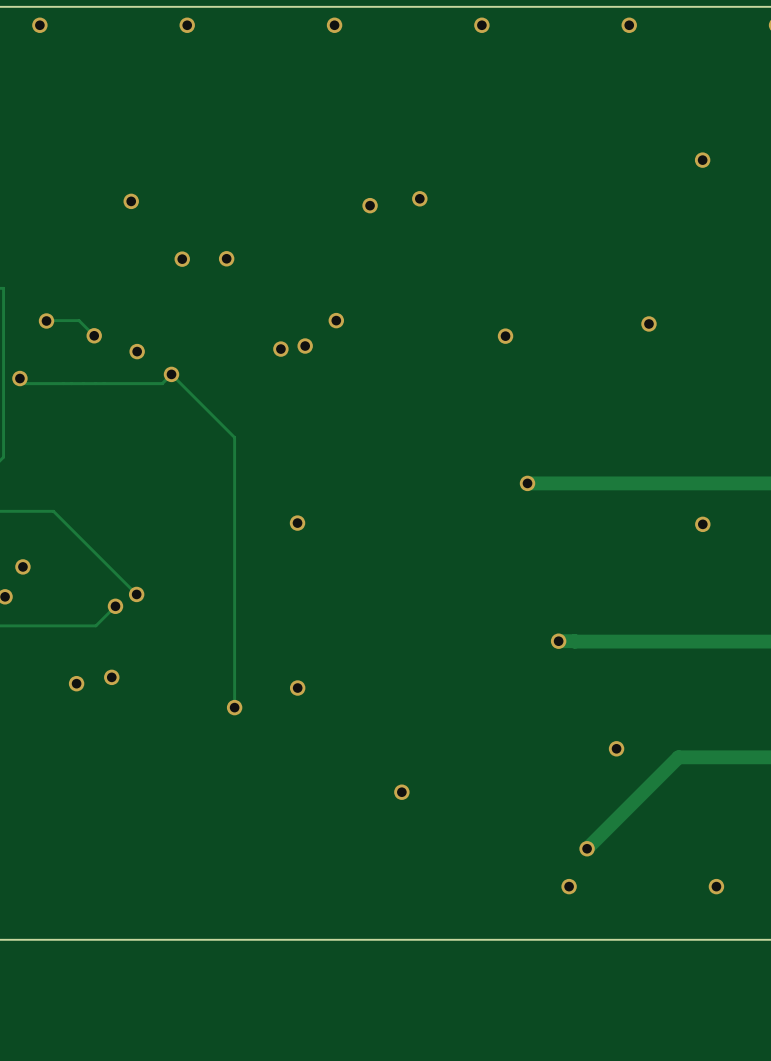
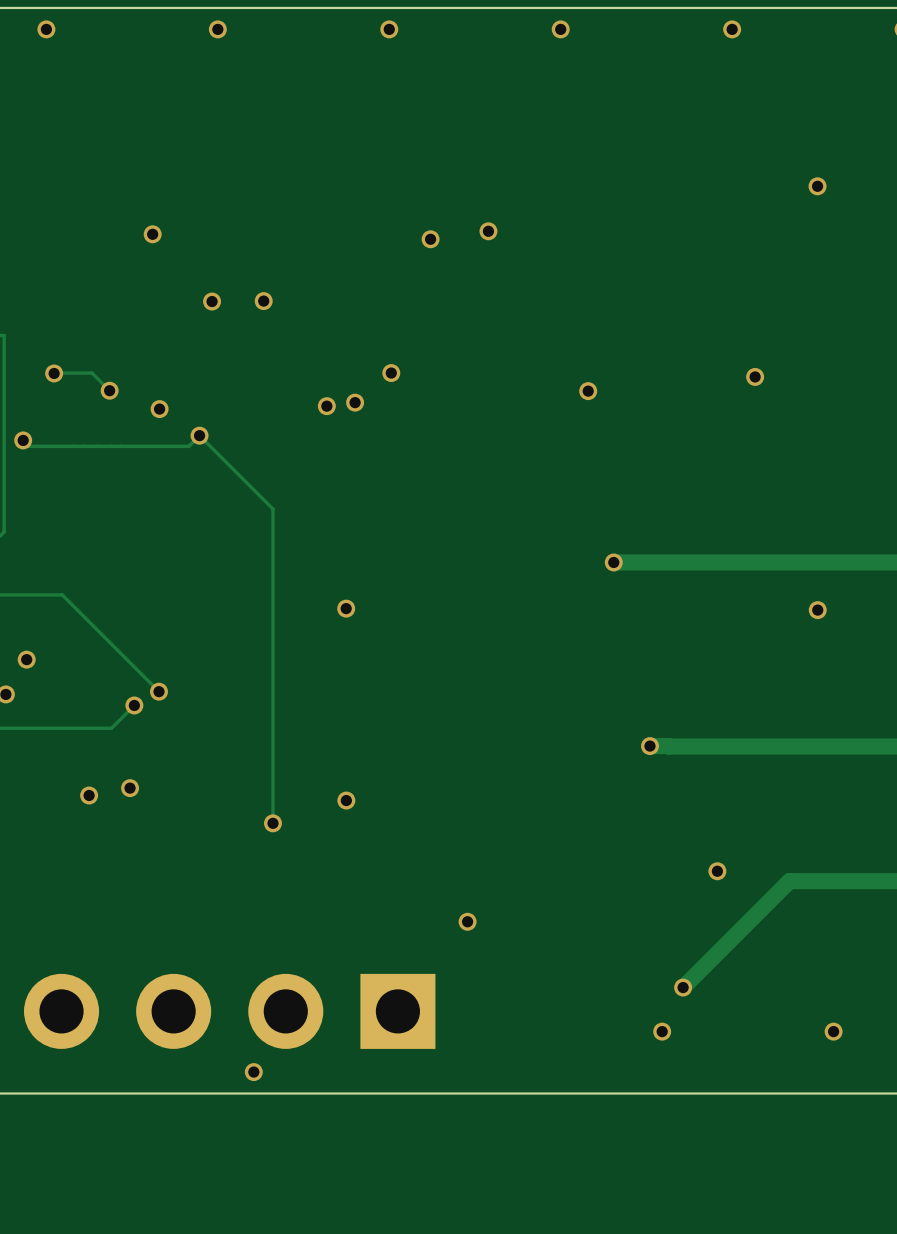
part: none -> (229, 1011)
via: none -> (253, 1072)

